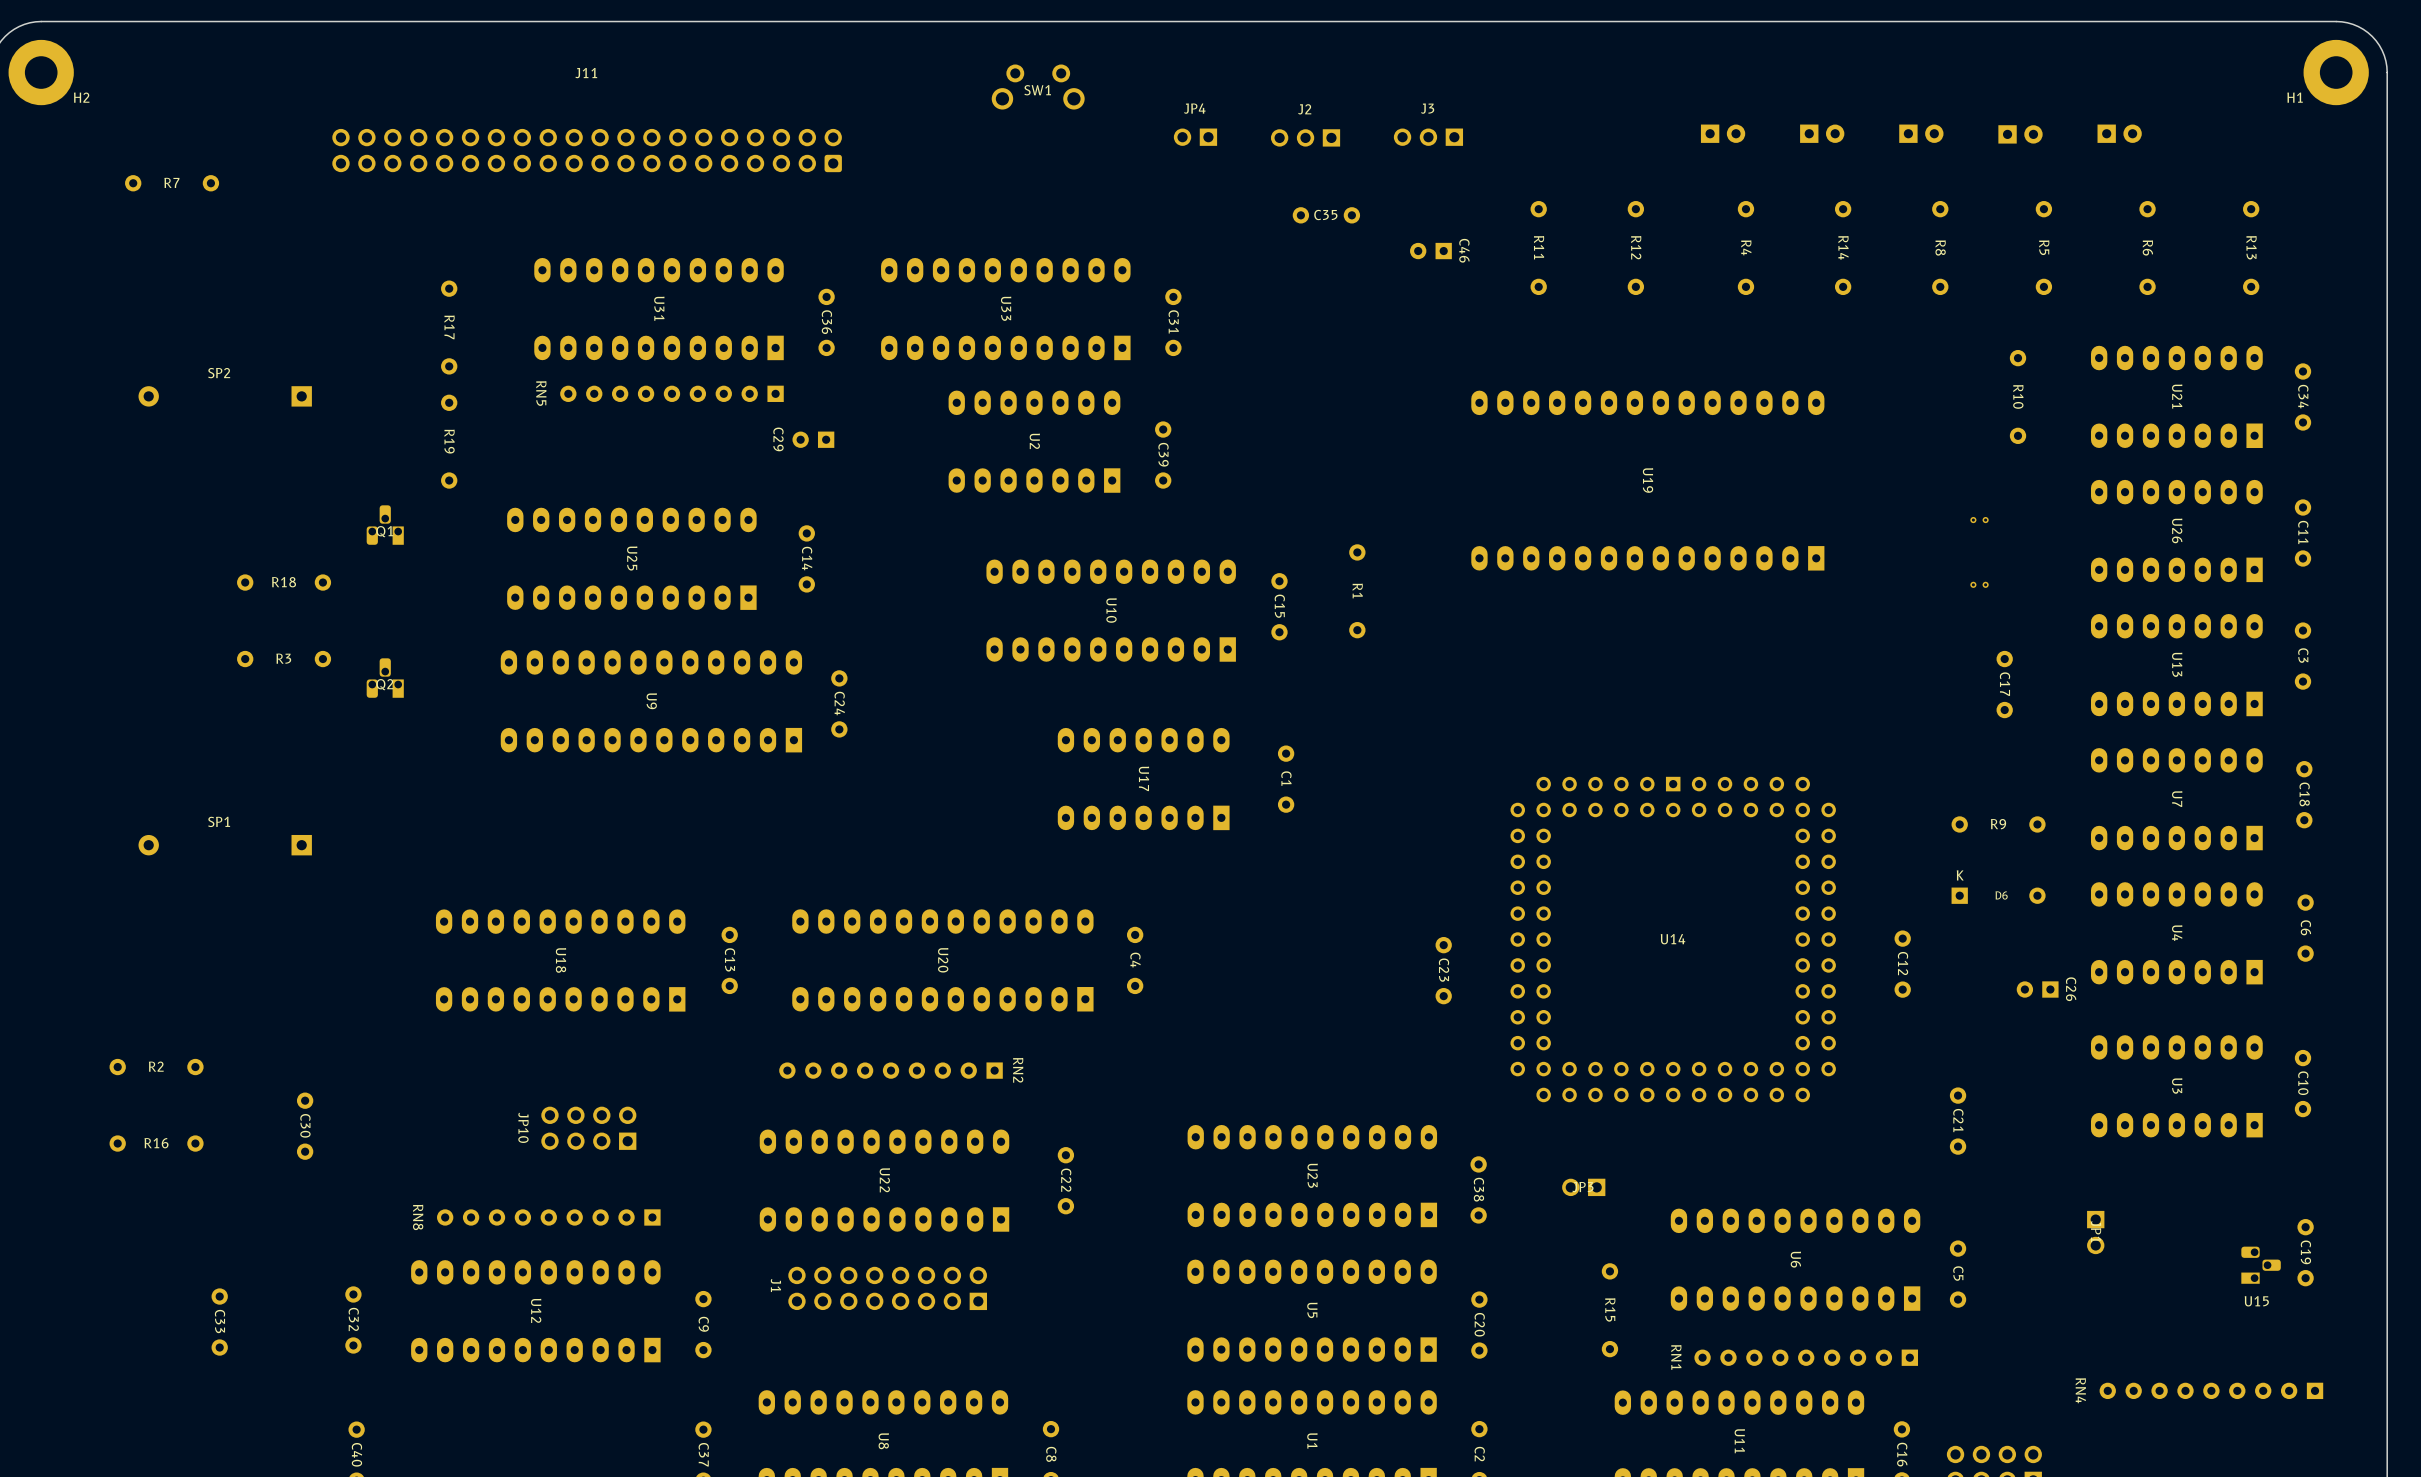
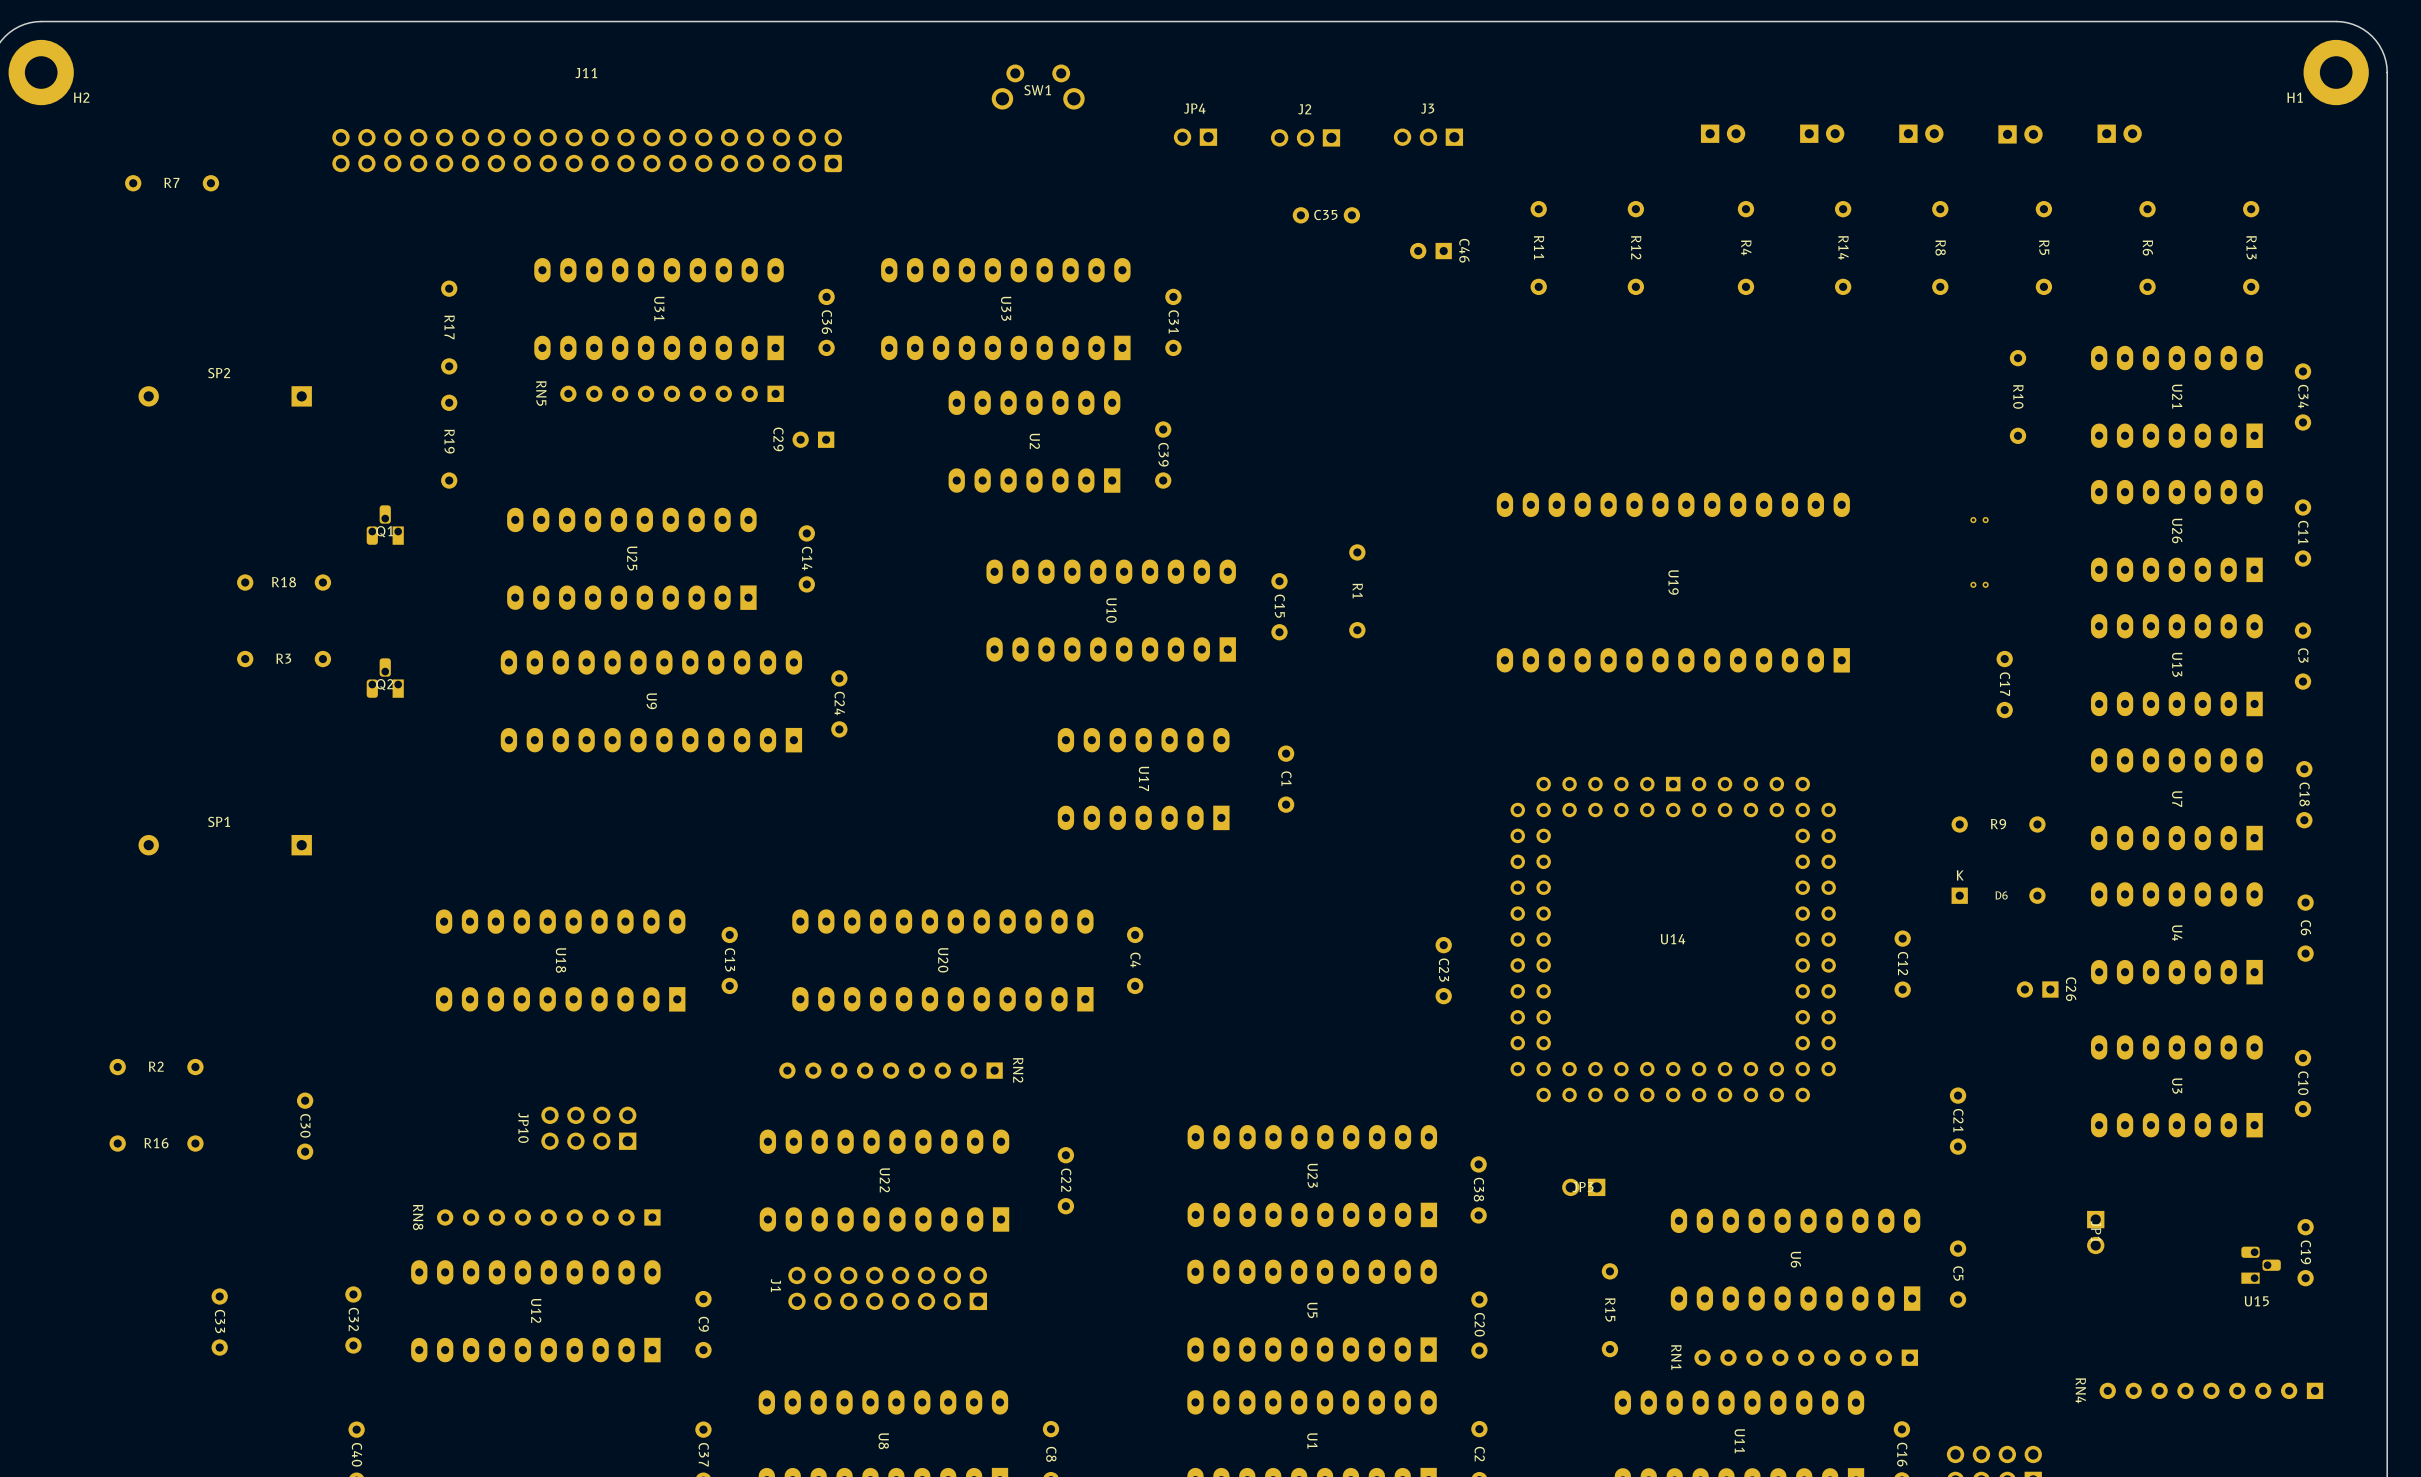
U19 position: (1647, 480) -> (1673, 582)

